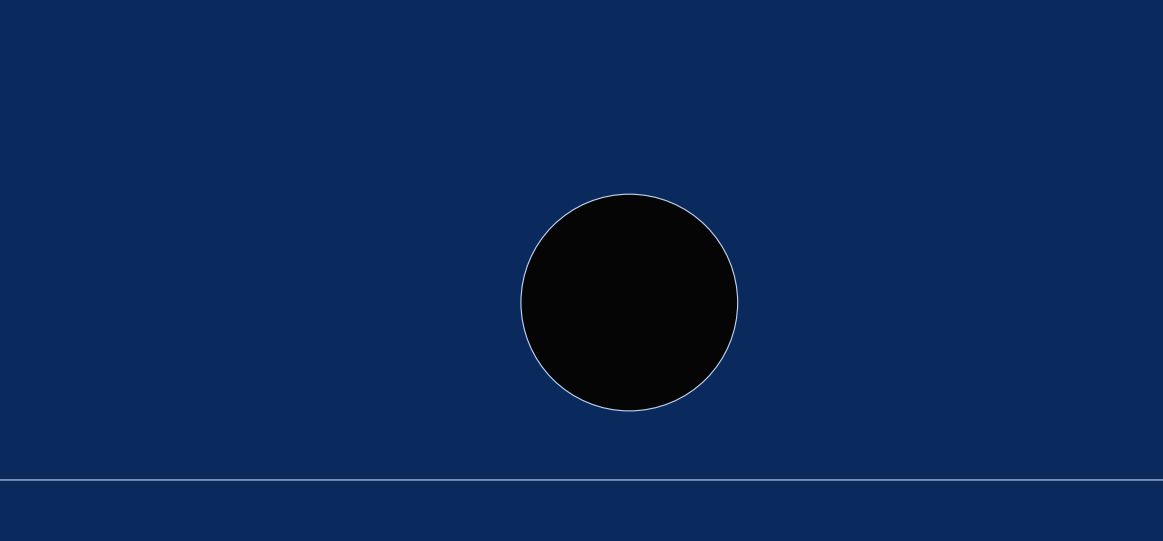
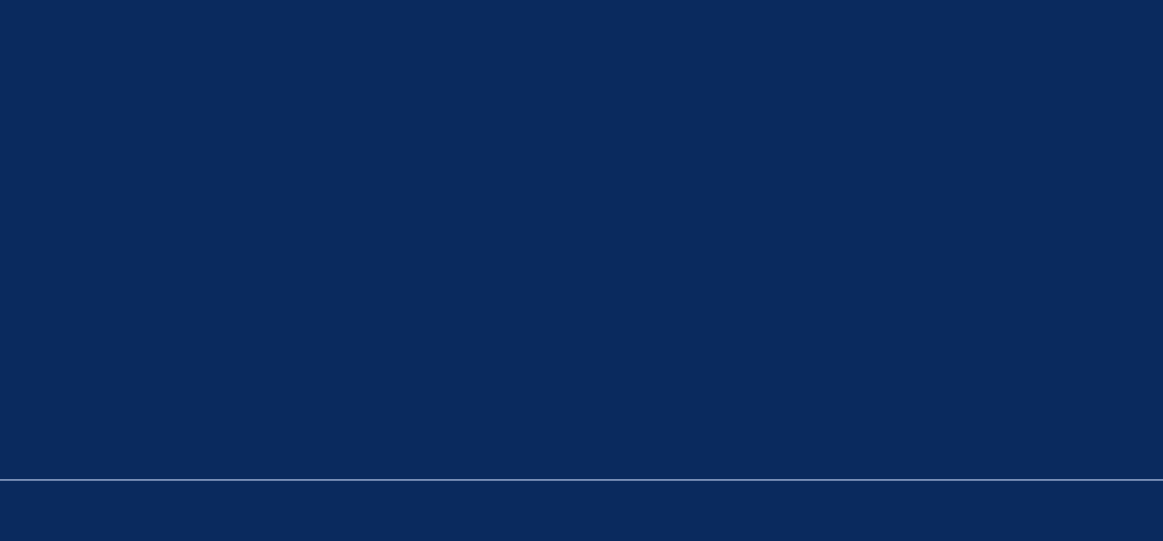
hole: (629, 302) -> none

